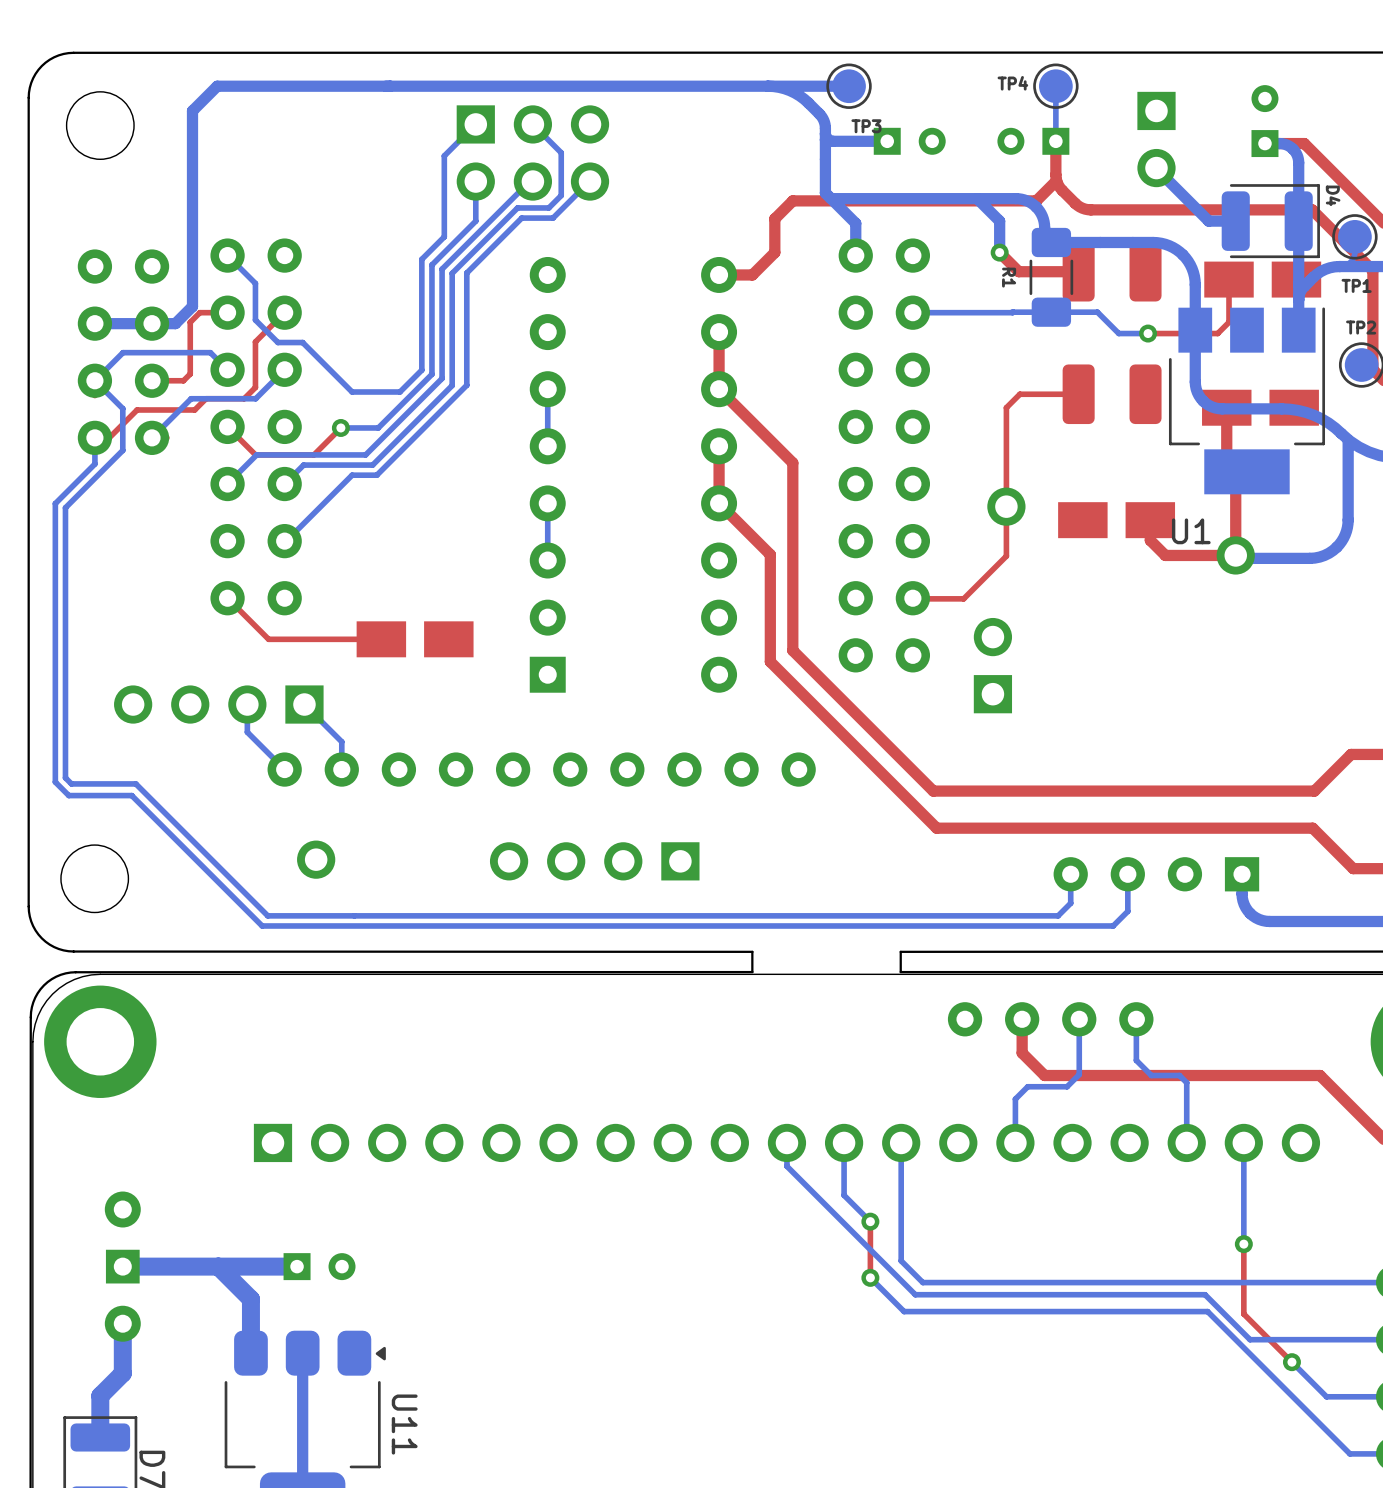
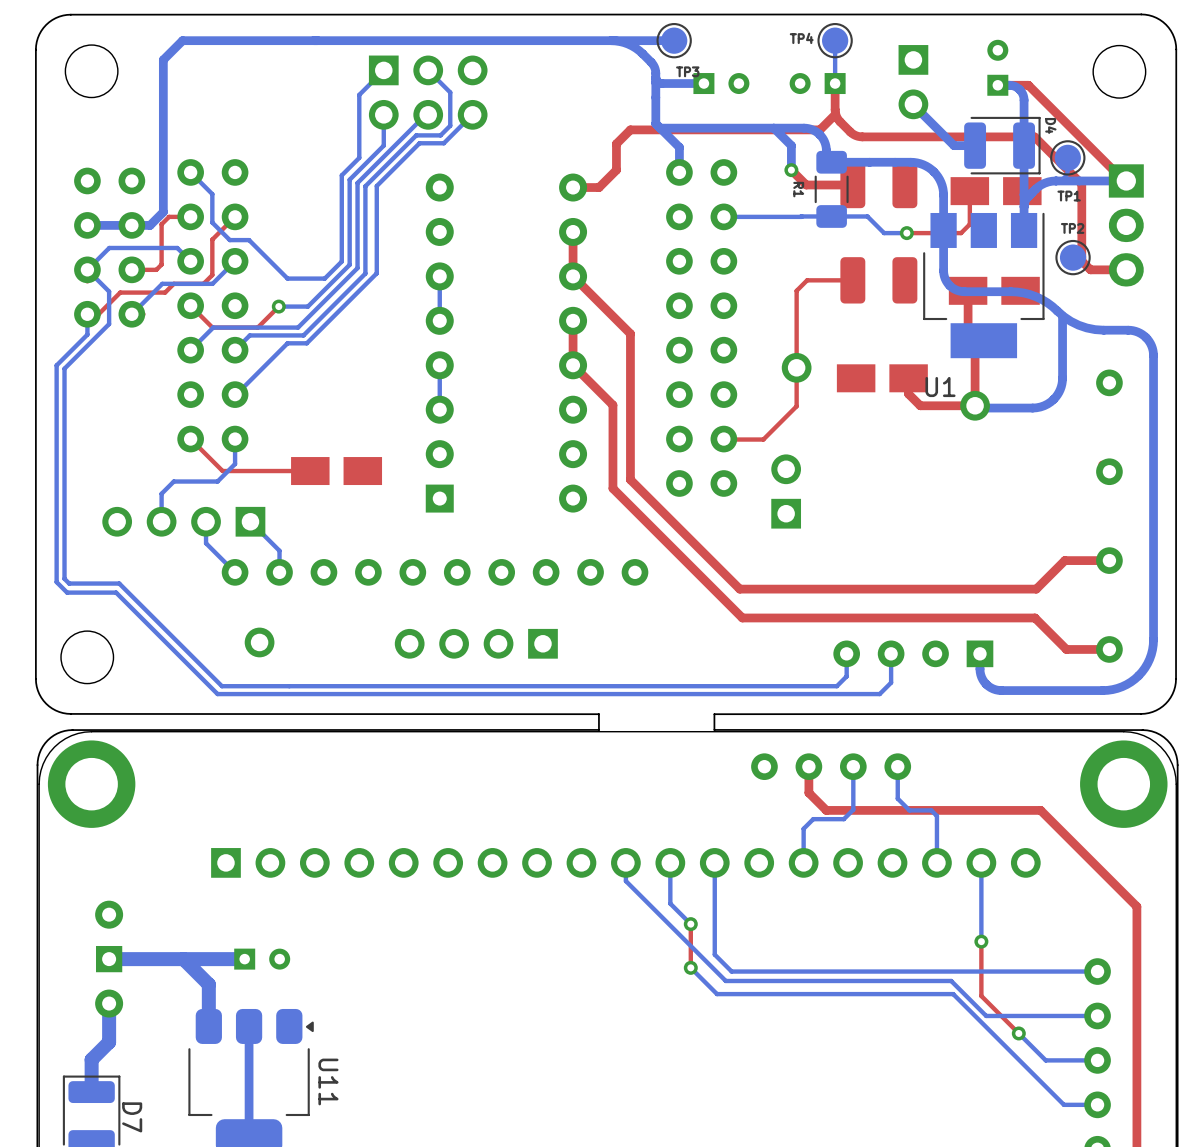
bottom track: none -> (235, 439) (235, 464) (217, 481) (173, 481) (161, 493) (161, 521)

